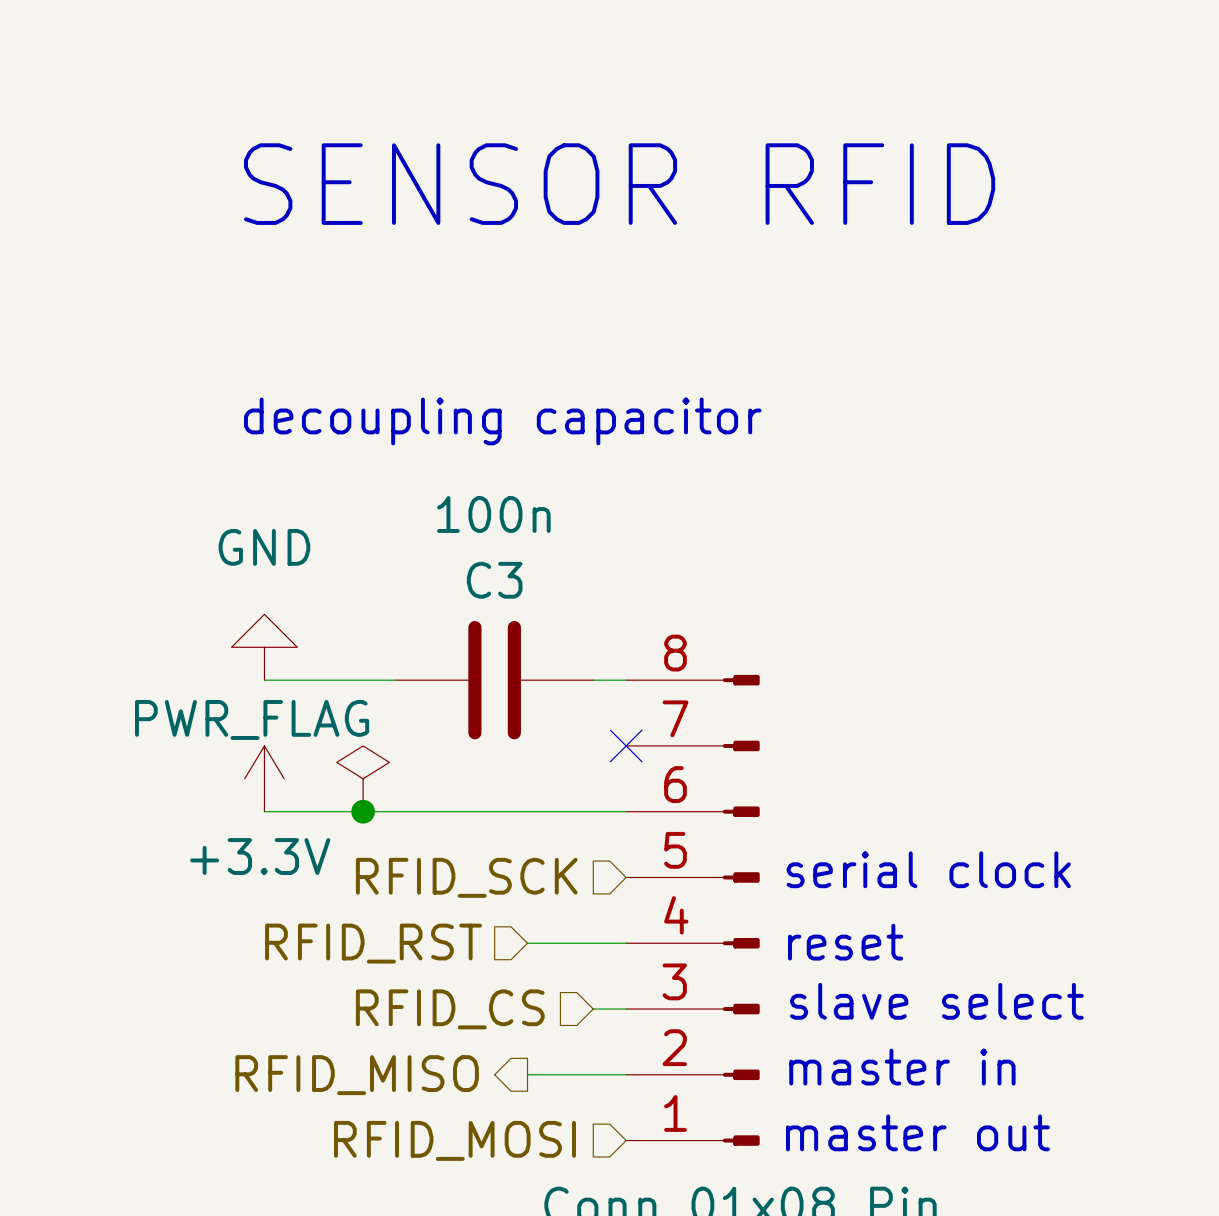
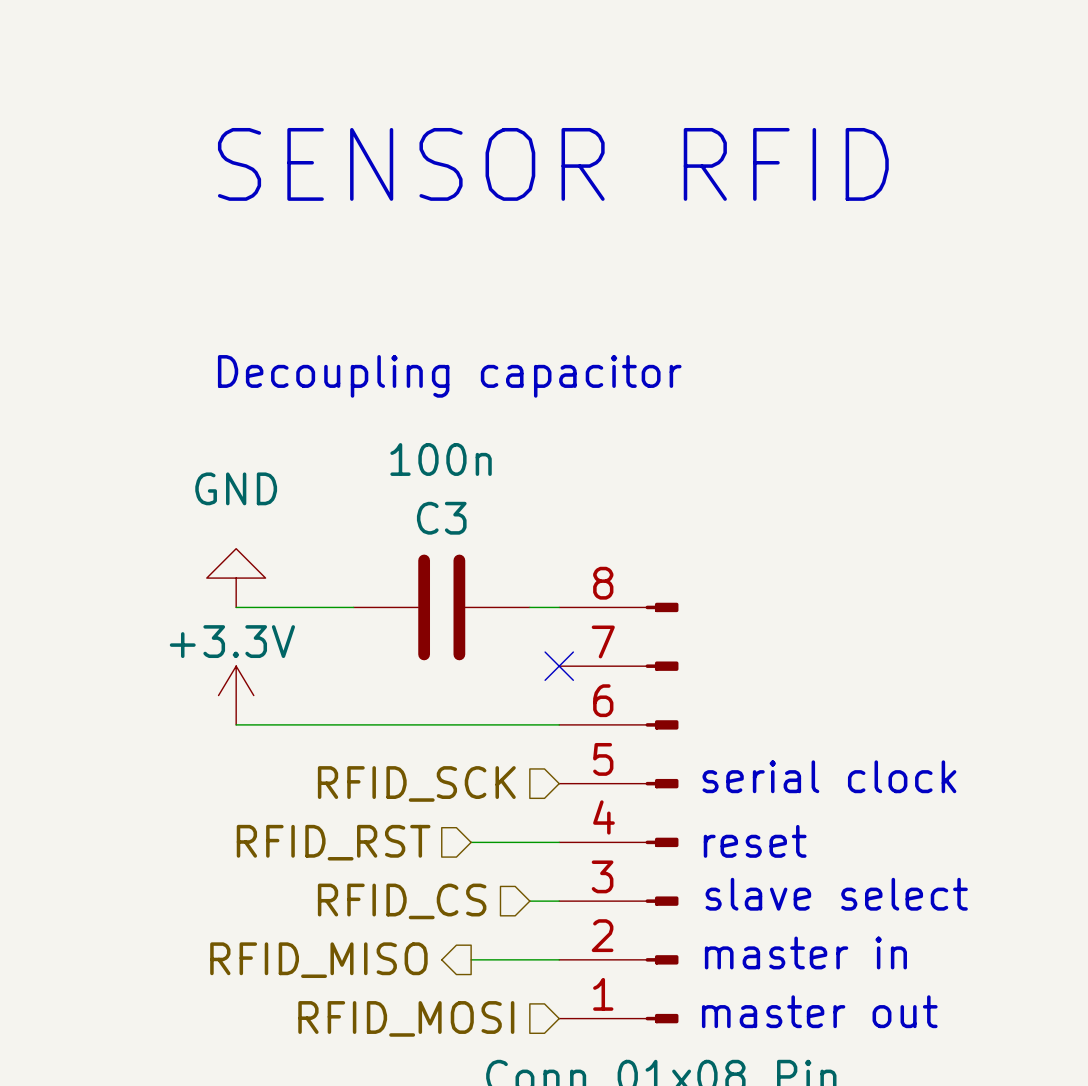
text: decoupling capacitor (502, 421) -> Decoupling capacitor (449, 376)
power symbol: PWR_FLAG (363, 778) -> none
junction: (363, 811) -> none
power symbol text position: +3.3V (260, 856) -> +3.3V (232, 641)

